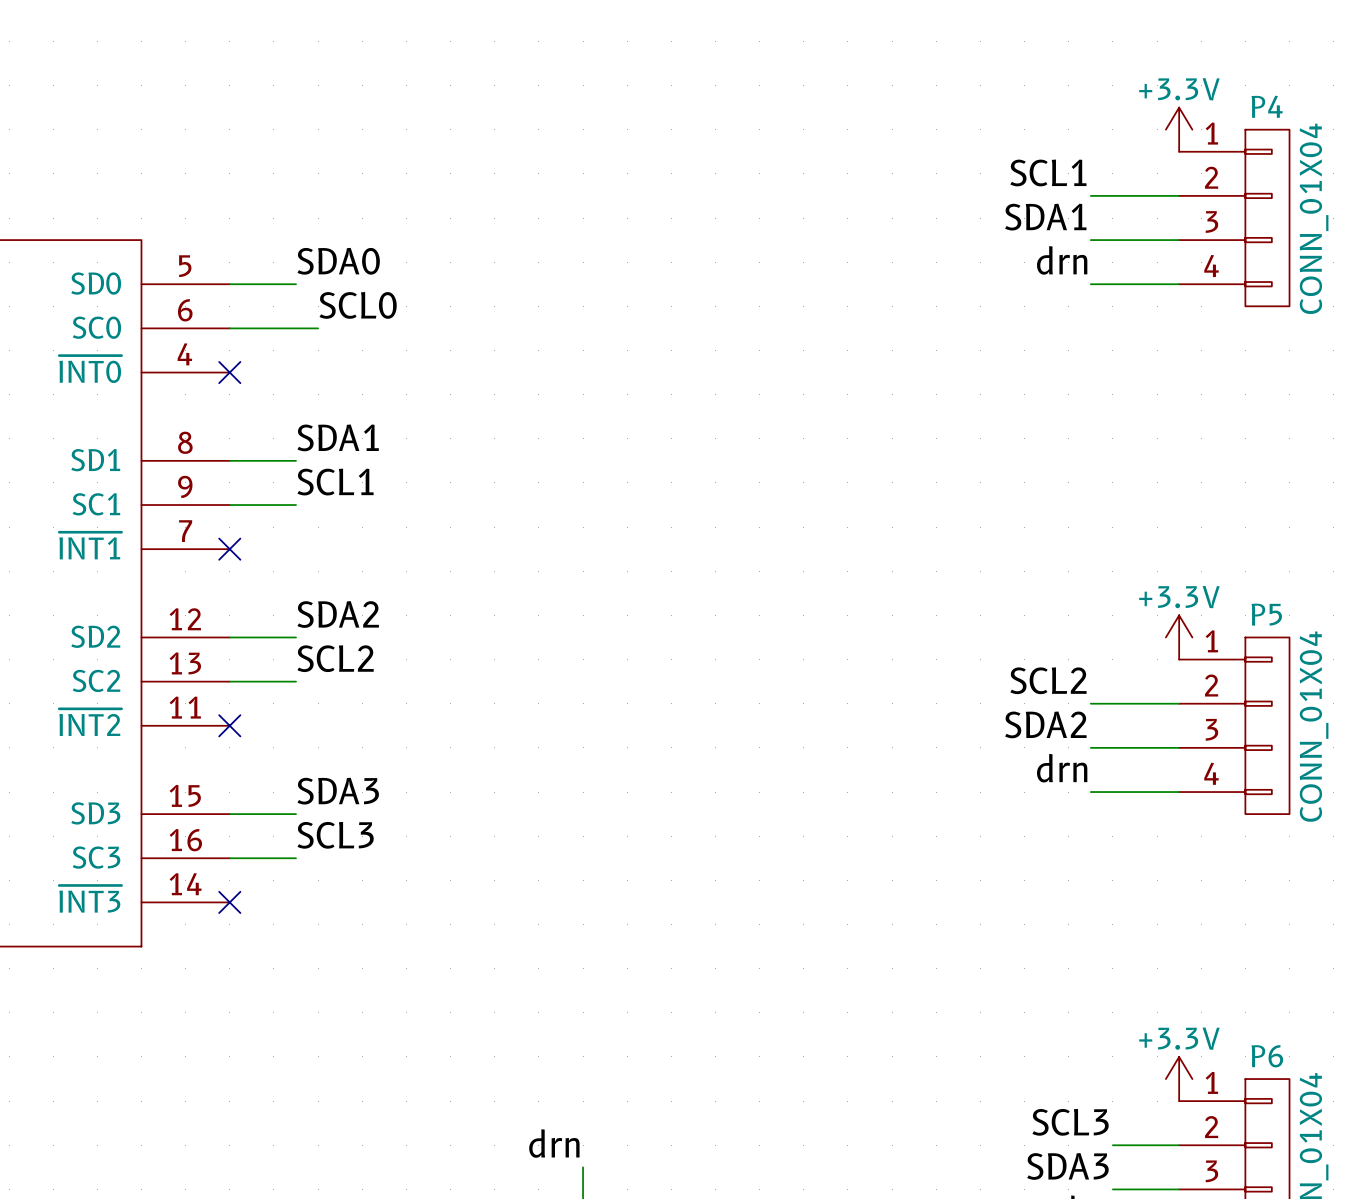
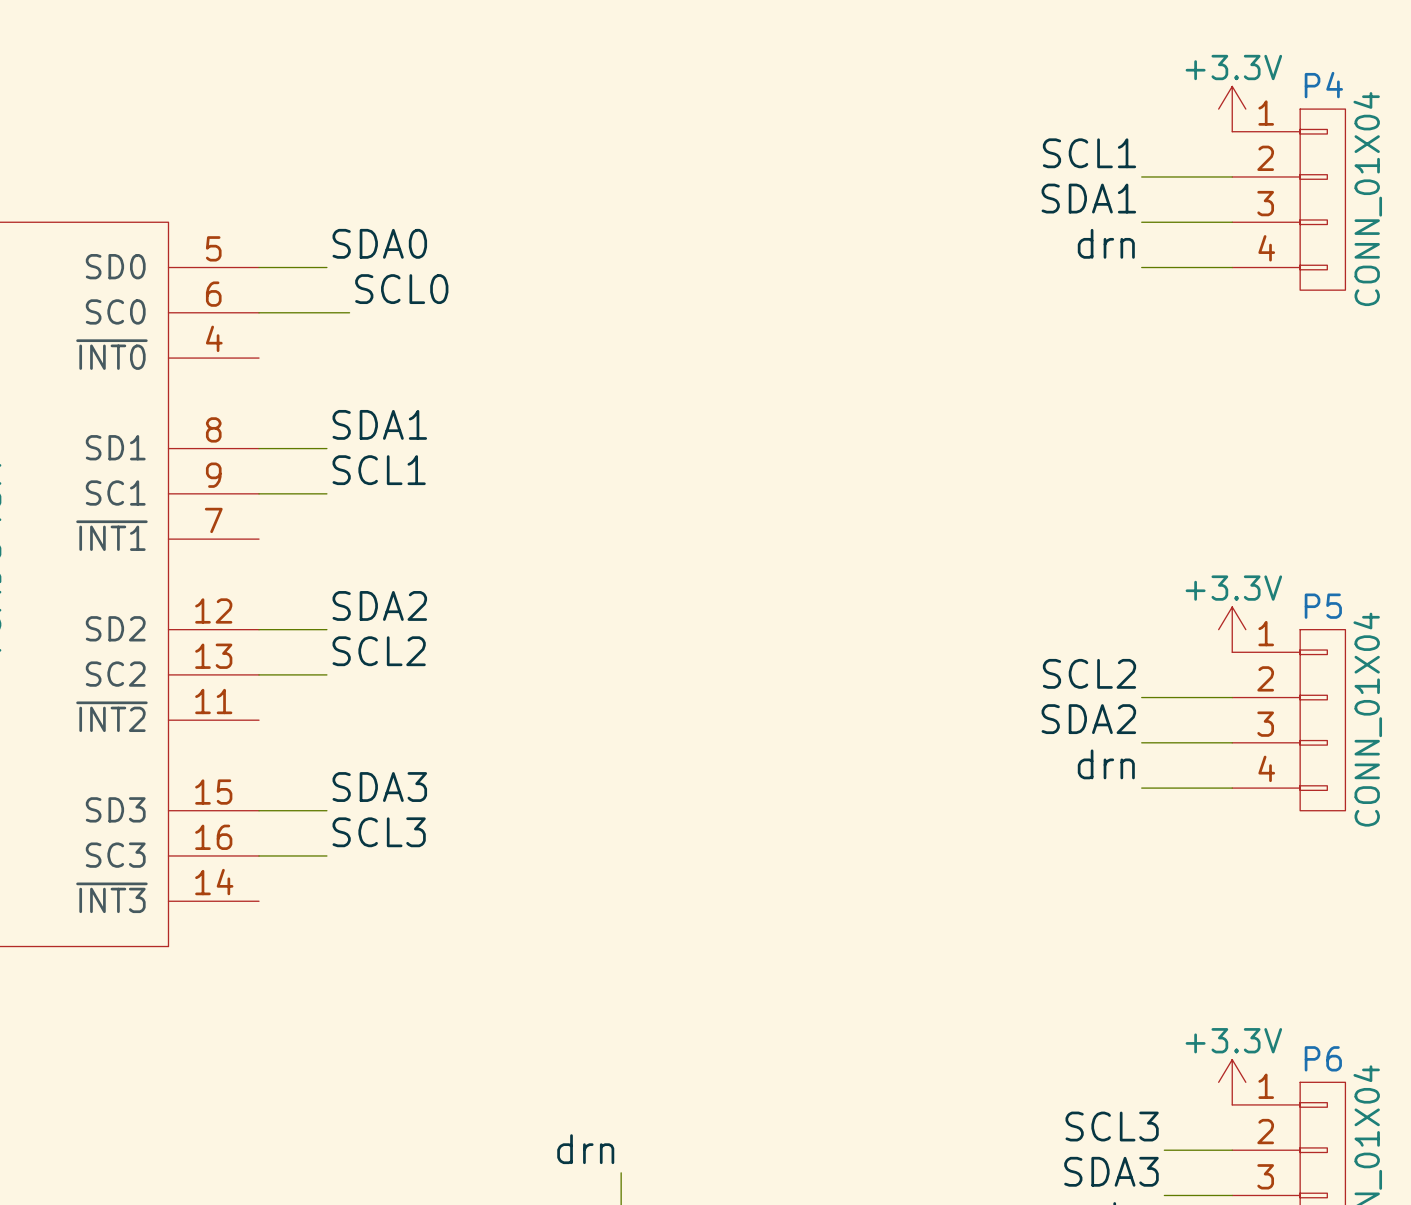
no-connect mark: (229, 372) -> none
no-connect mark: (229, 549) -> none
no-connect mark: (229, 725) -> none
no-connect mark: (229, 902) -> none

